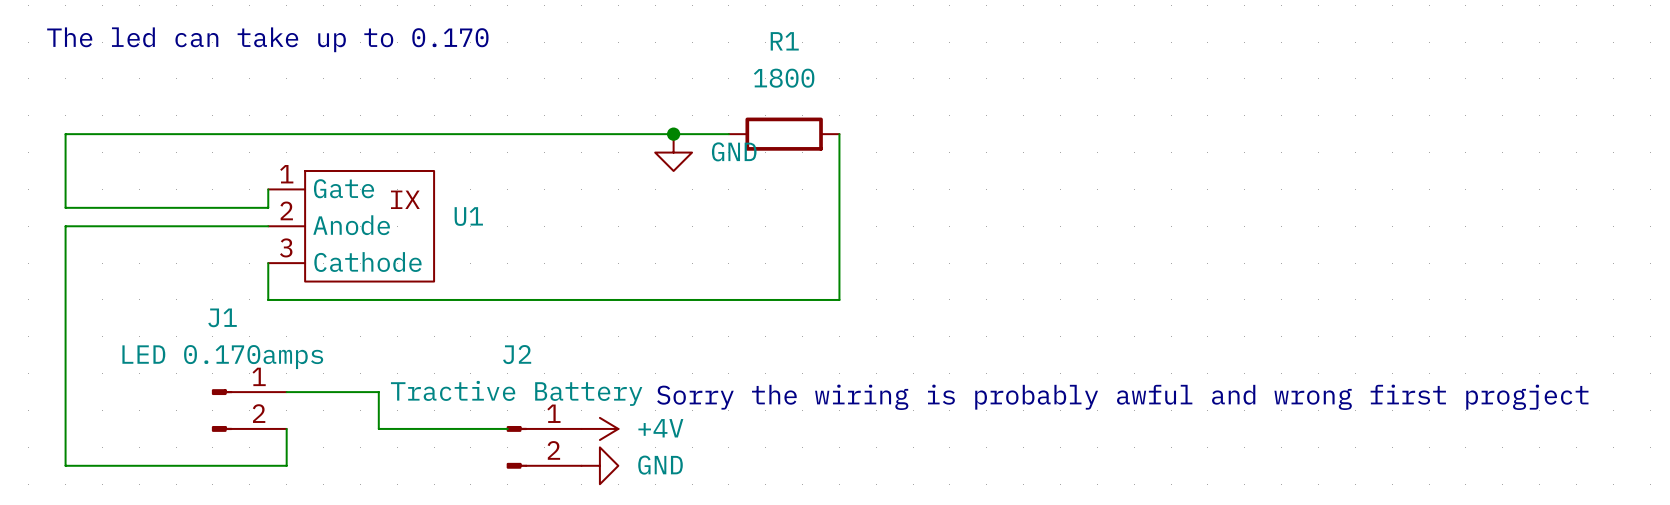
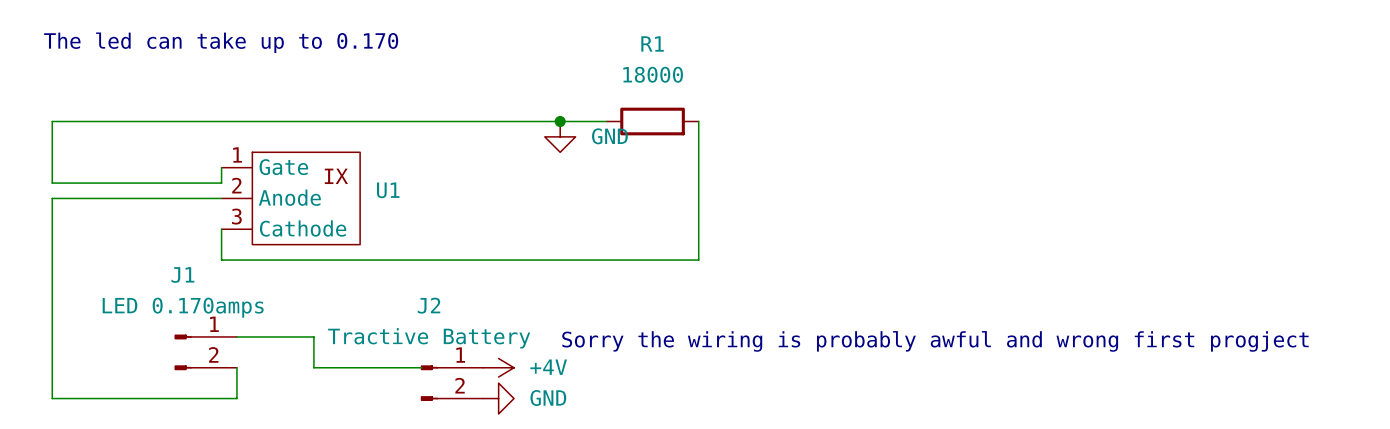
R1 value: 1800 (784, 78) -> 18000 (653, 74)

